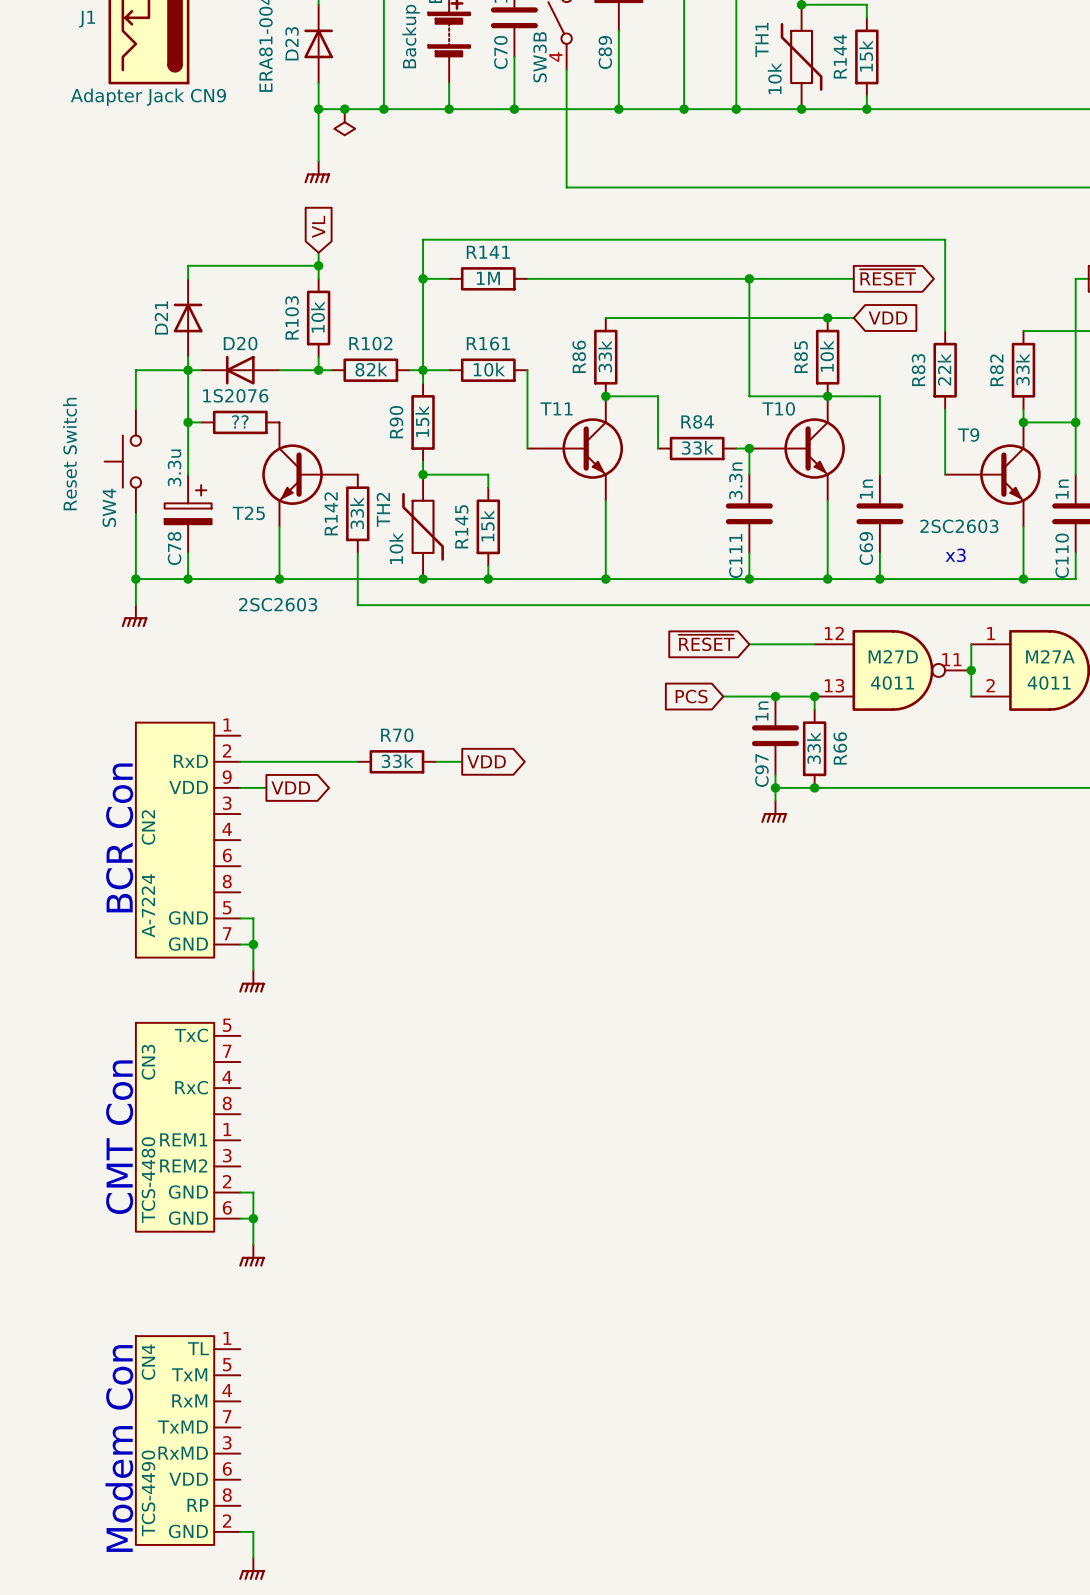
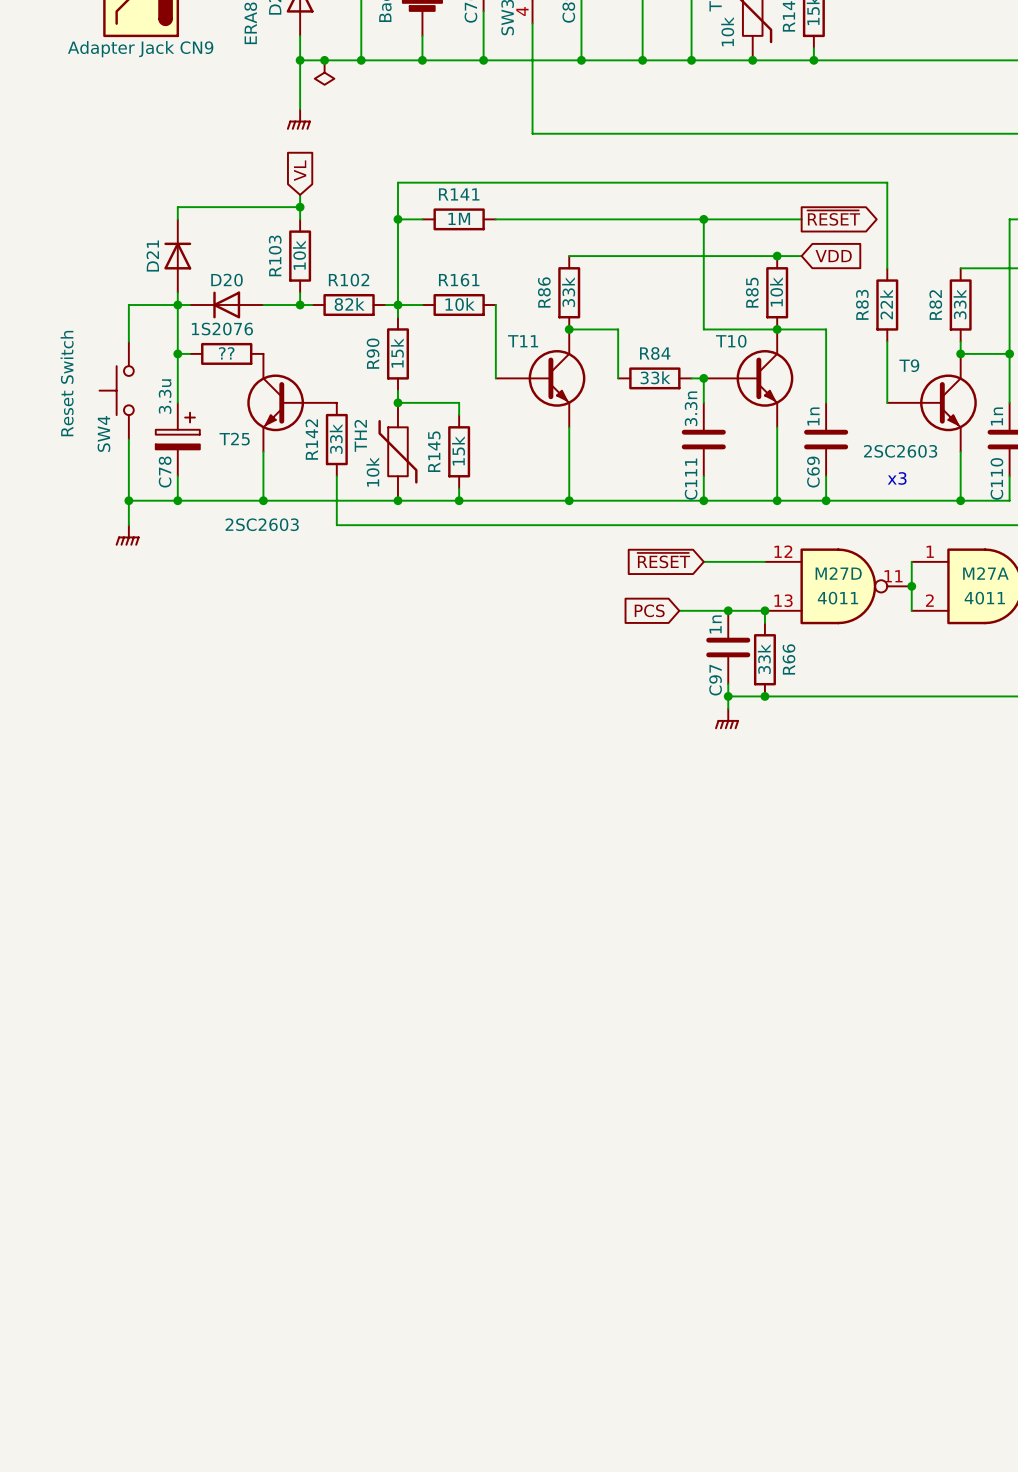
wire: (240, 761) (357, 761) -> none
R70: 33k (396, 761) -> none
wire: (436, 761) (462, 761) -> none
global label: VDD (486, 761) -> none
wire: (240, 787) (266, 787) -> none
global label: VDD (290, 787) -> none
text: BCR Con (119, 837) -> none
CN2: A-7224 (188, 840) -> none
wire: (240, 918) (253, 918) (253, 970) -> none
wire: (240, 944) (253, 944) -> none
junction: (253, 944) -> none
power symbol: (252, 981) -> none
CN3: TCS-4480 (188, 1127) -> none
text: CMT Con (119, 1137) -> none
wire: (240, 1192) (253, 1192) (253, 1244) -> none
wire: (240, 1218) (253, 1218) -> none
junction: (253, 1218) -> none
power symbol: (252, 1255) -> none
CN4: TCS-4490 (188, 1440) -> none
text: Modem Con (119, 1448) -> none
wire: (240, 1531) (253, 1531) (253, 1558) -> none
power symbol: (252, 1568) -> none

